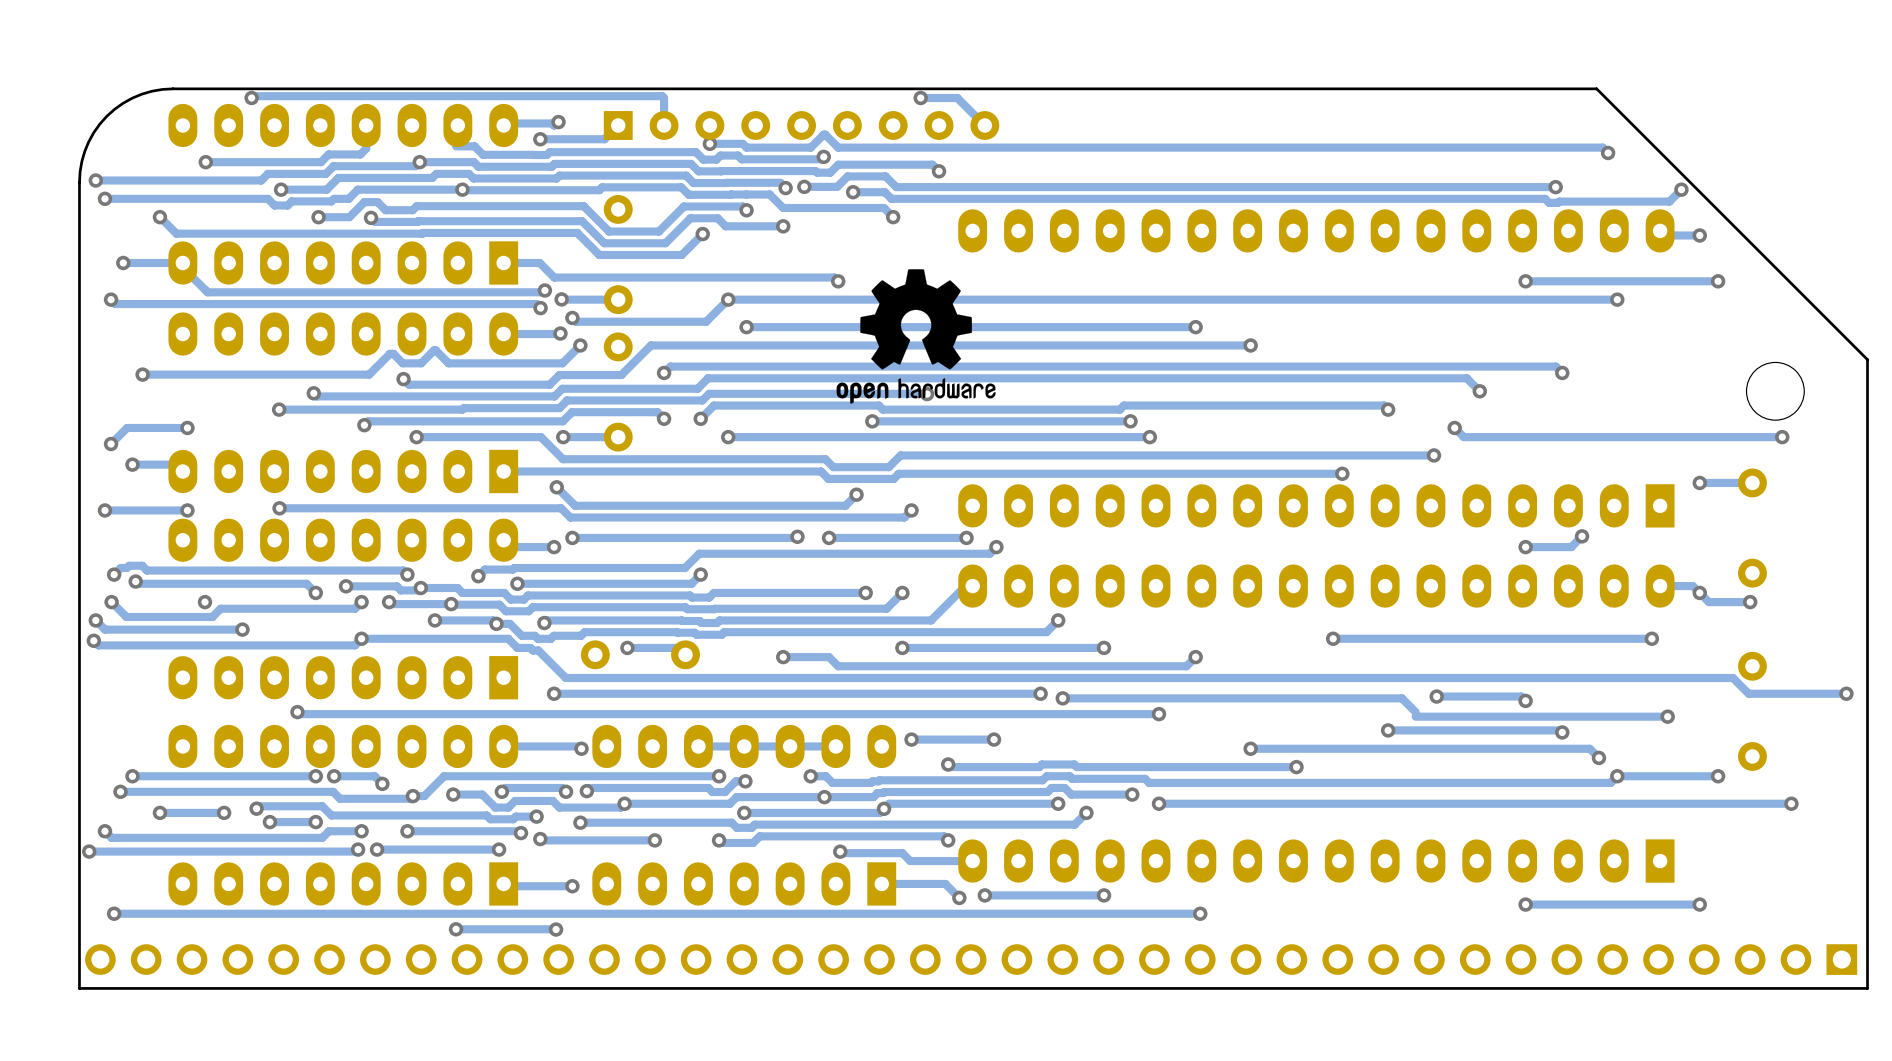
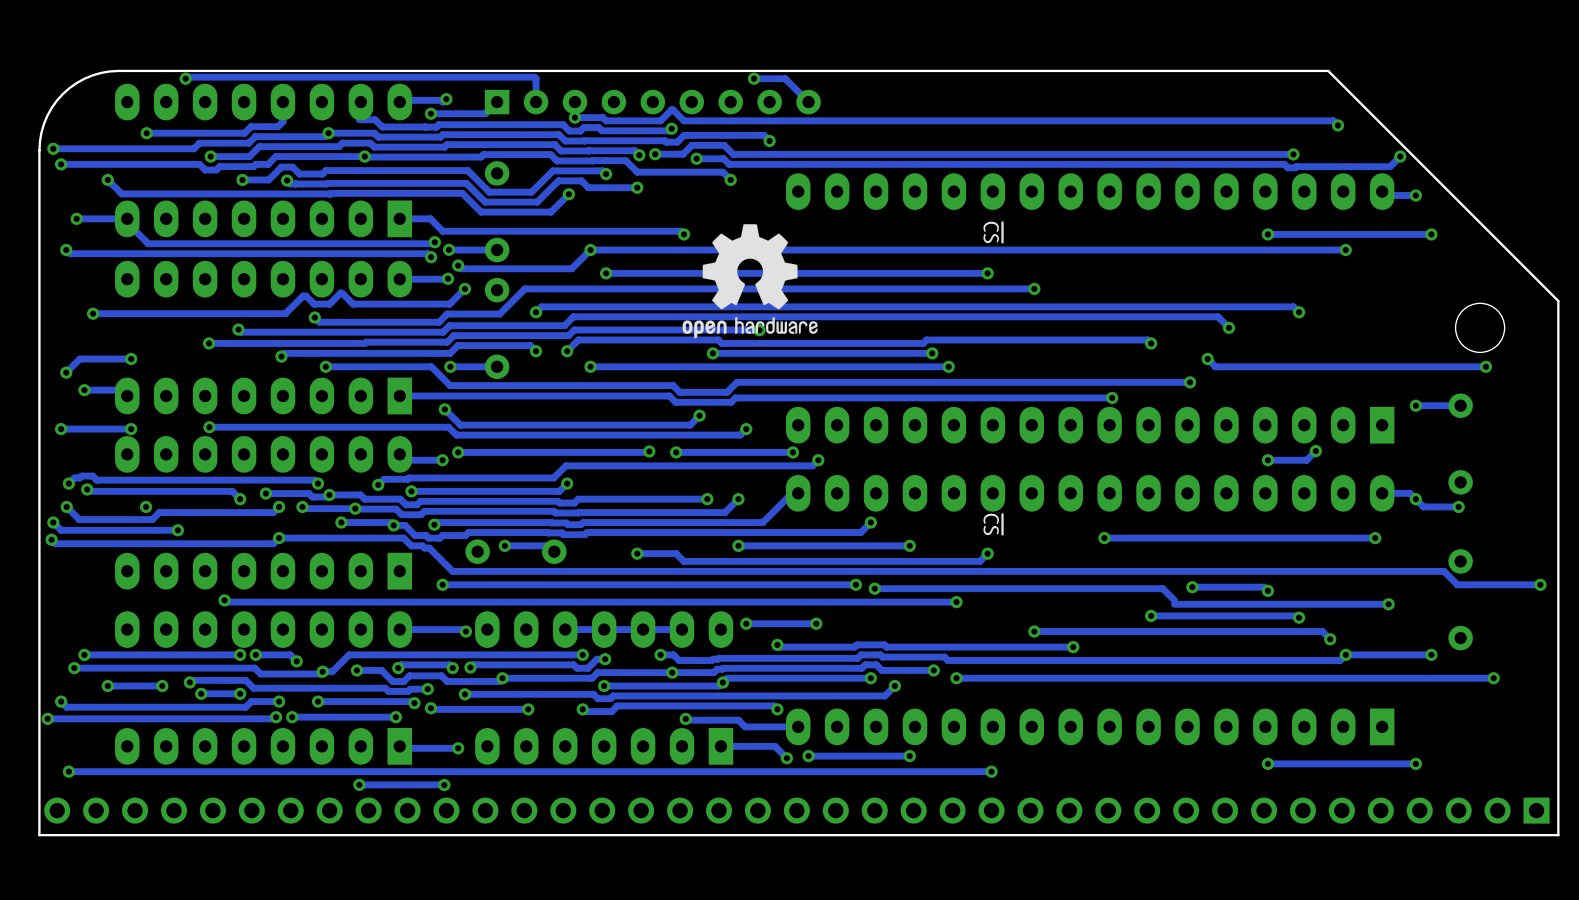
text: none -> ~{CS} (992, 232)
text: none -> ~{CS} (992, 524)

